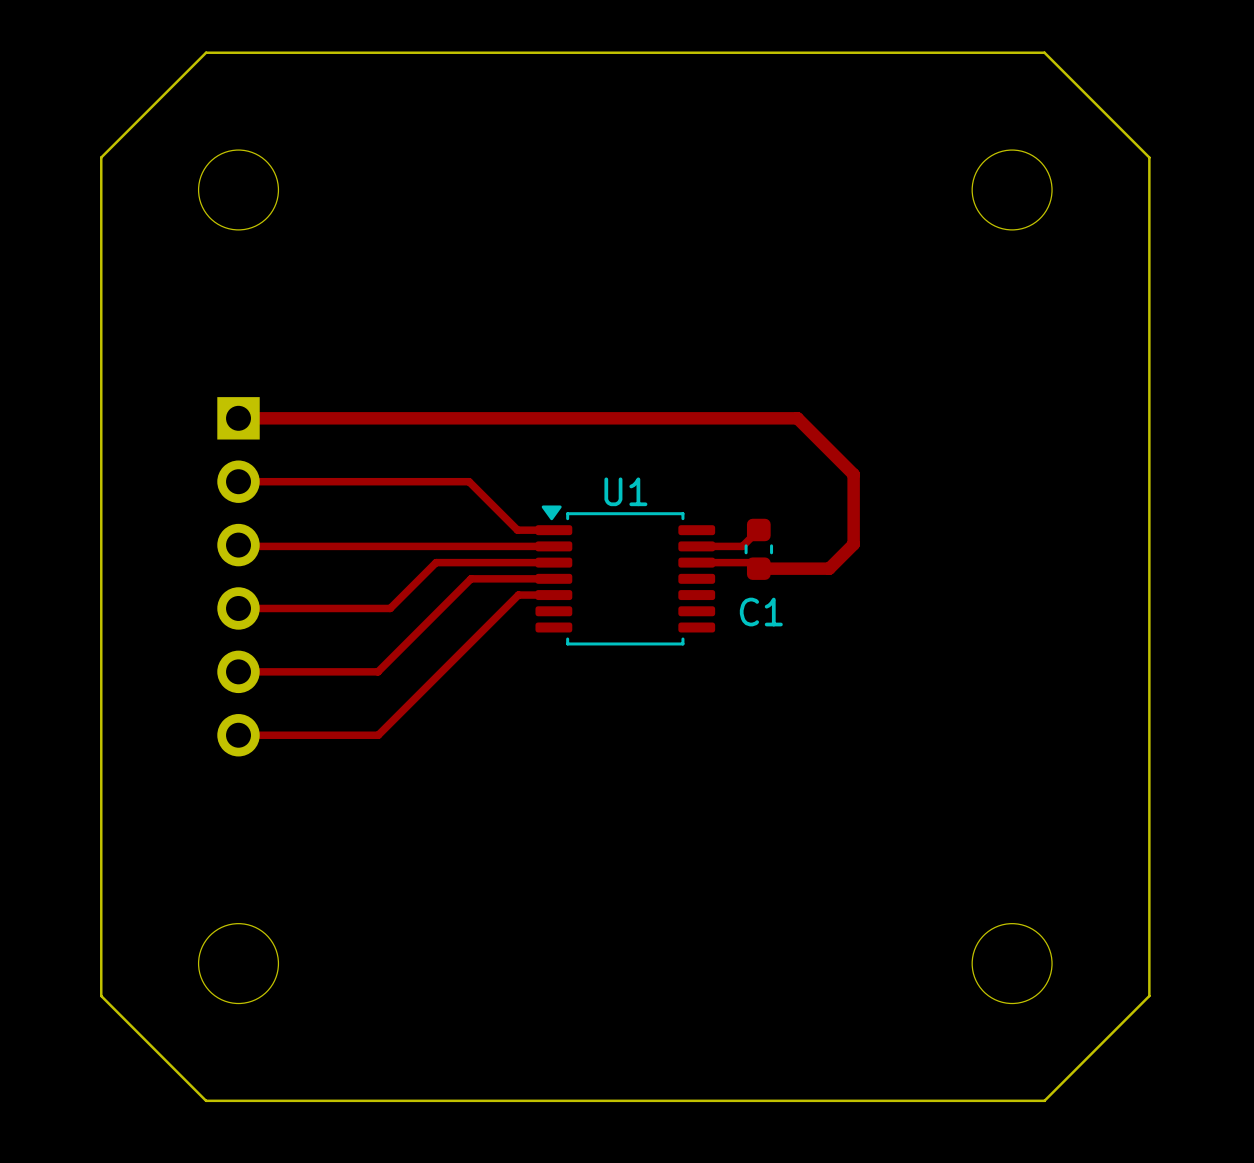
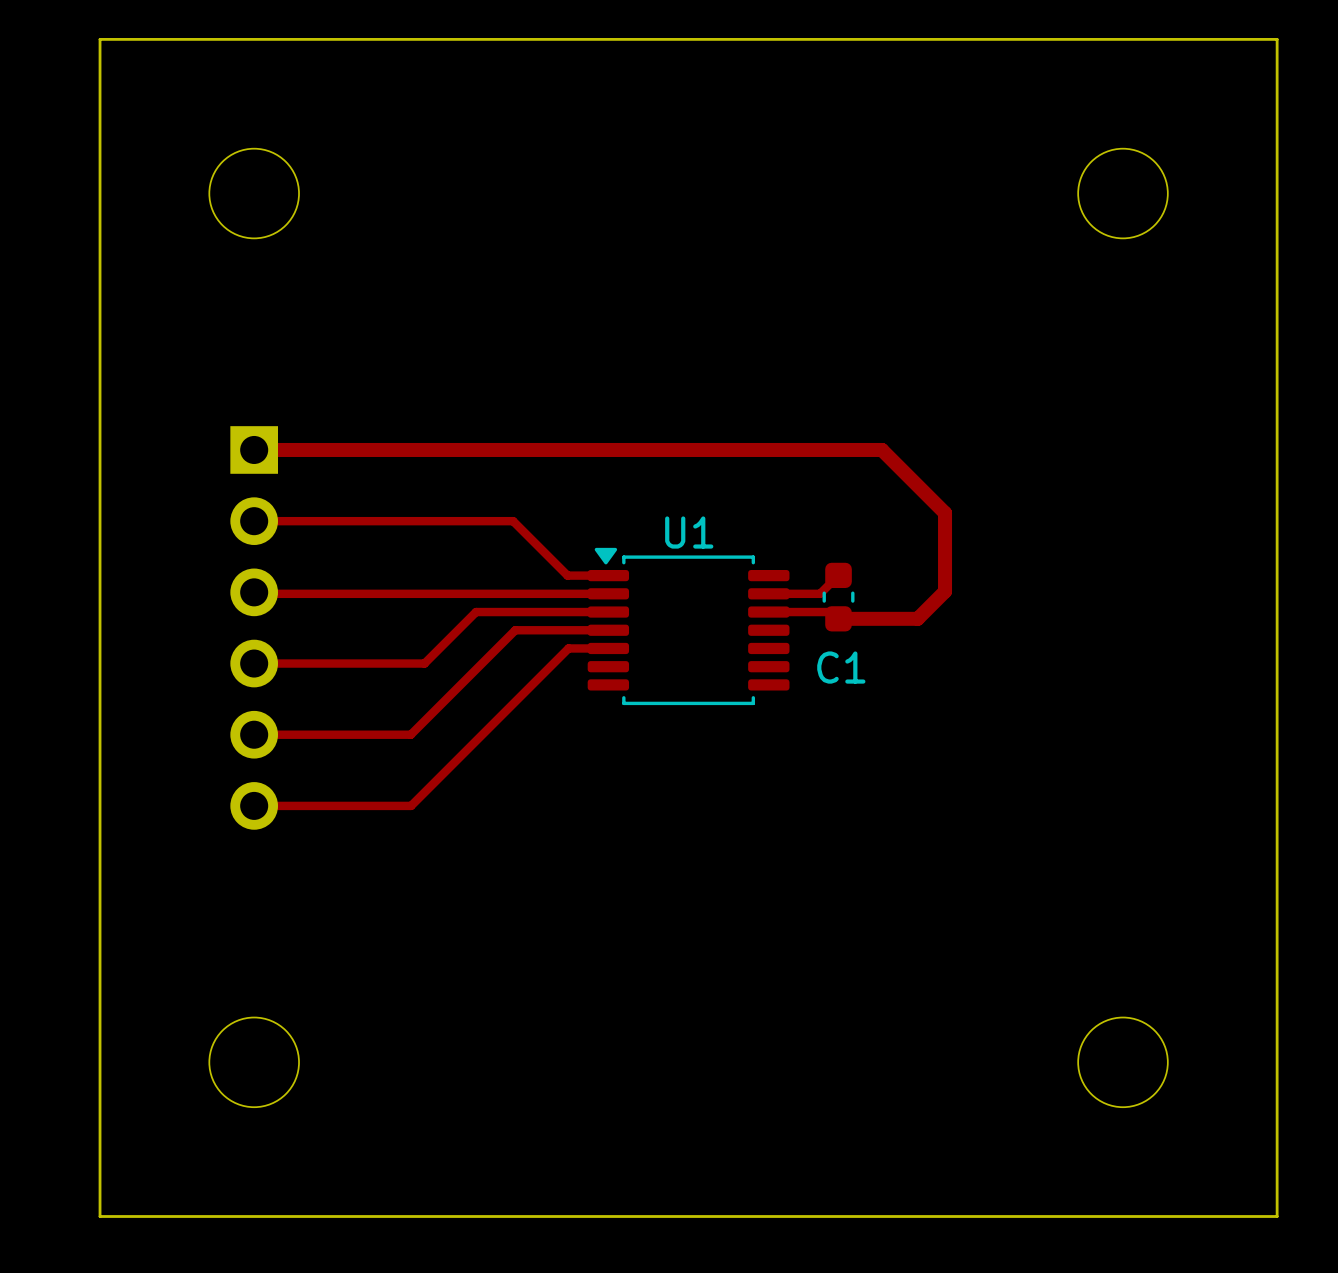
board edge: (206, 52) (101, 157) -> (217, 39) (100, 39) (100, 157)
board edge: (1044, 52) (1149, 157) -> (1159, 39) (1277, 39) (1277, 157)
board edge: (101, 996) (206, 1100) -> (100, 1098) (100, 1216) (217, 1216)
board edge: (1149, 996) (1044, 1100) -> (1277, 1098) (1277, 1216) (1159, 1216)

